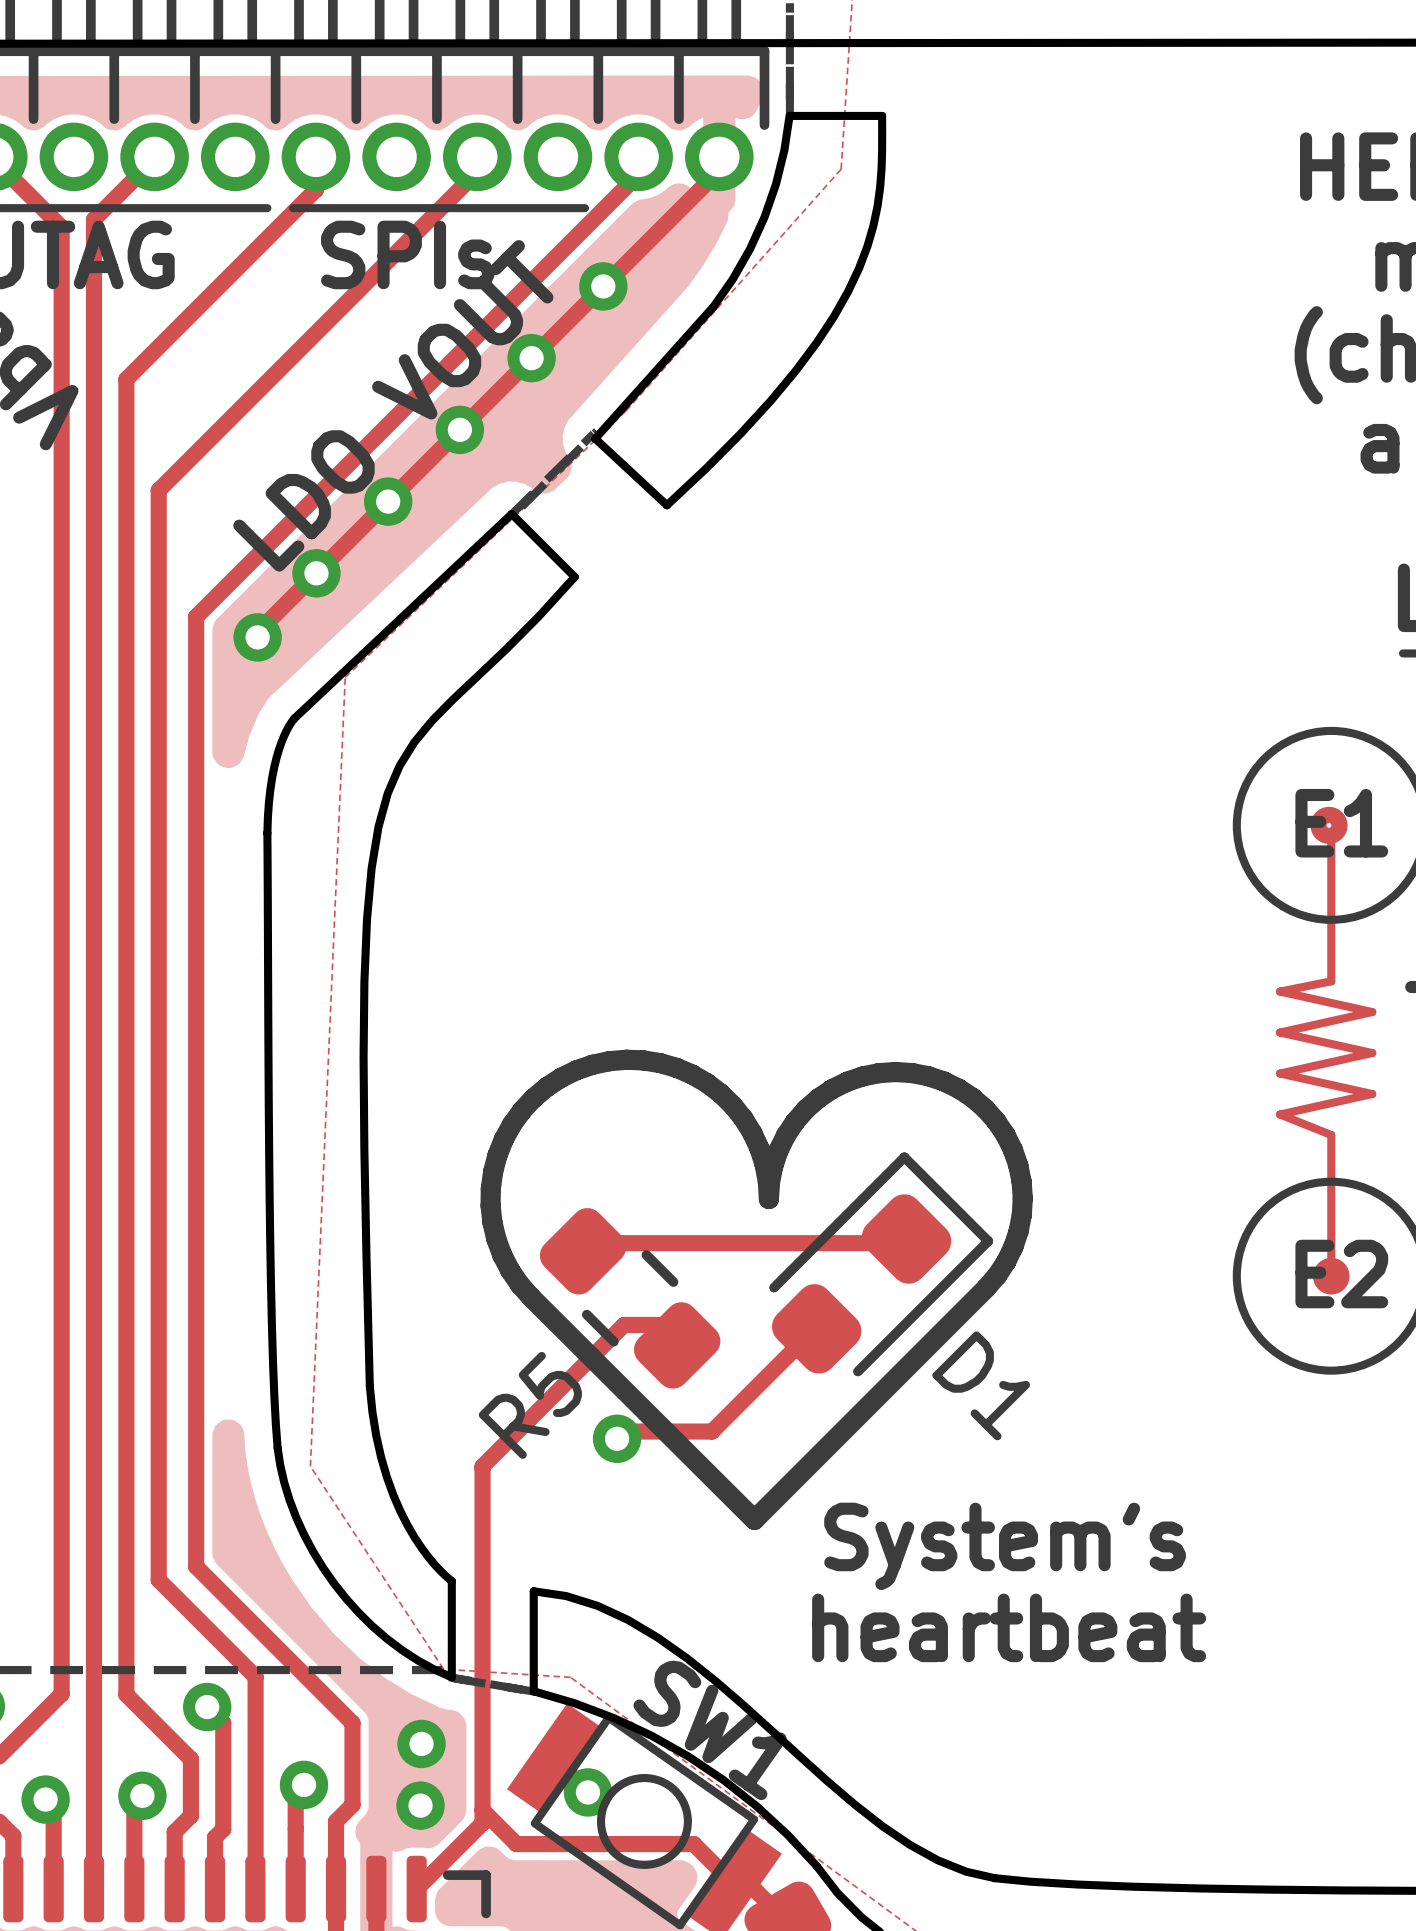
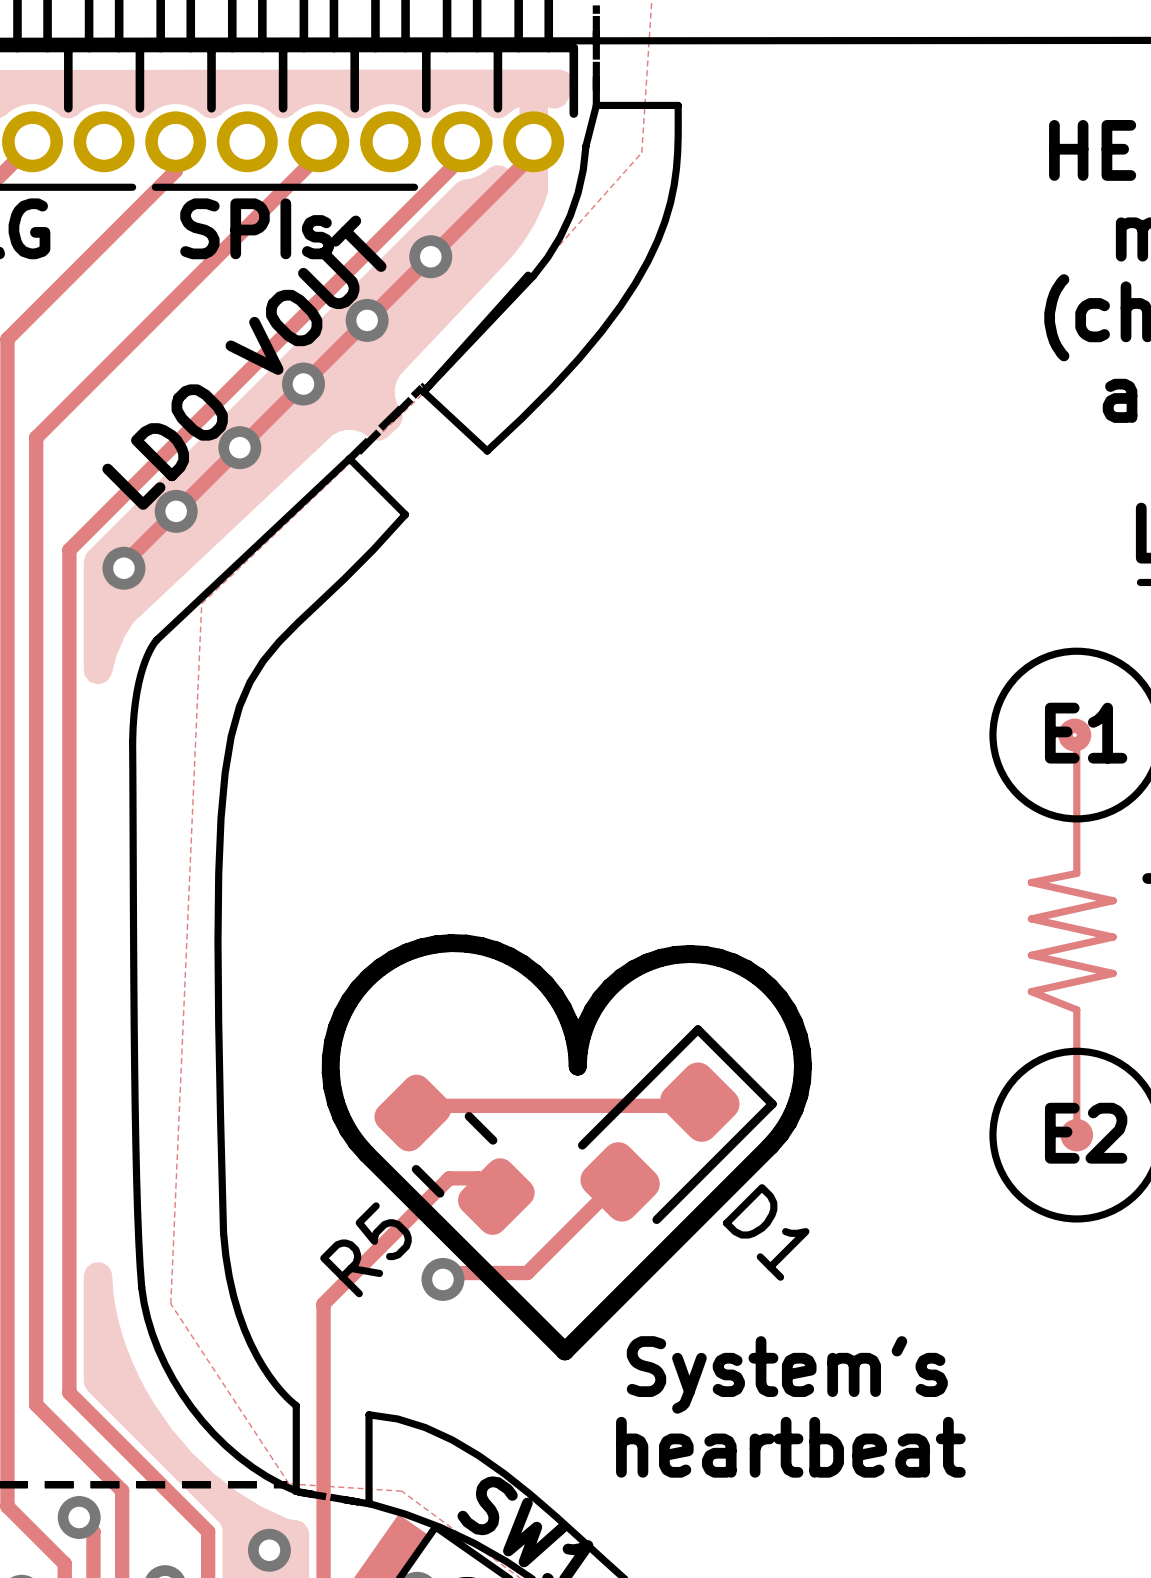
board edge: (789, 115) (784, 150) (775, 184) (764, 217) (750, 248) (732, 279) (712, 307) -> (596, 105) (585, 146) (578, 193) (560, 237) (533, 276) (423, 391)

